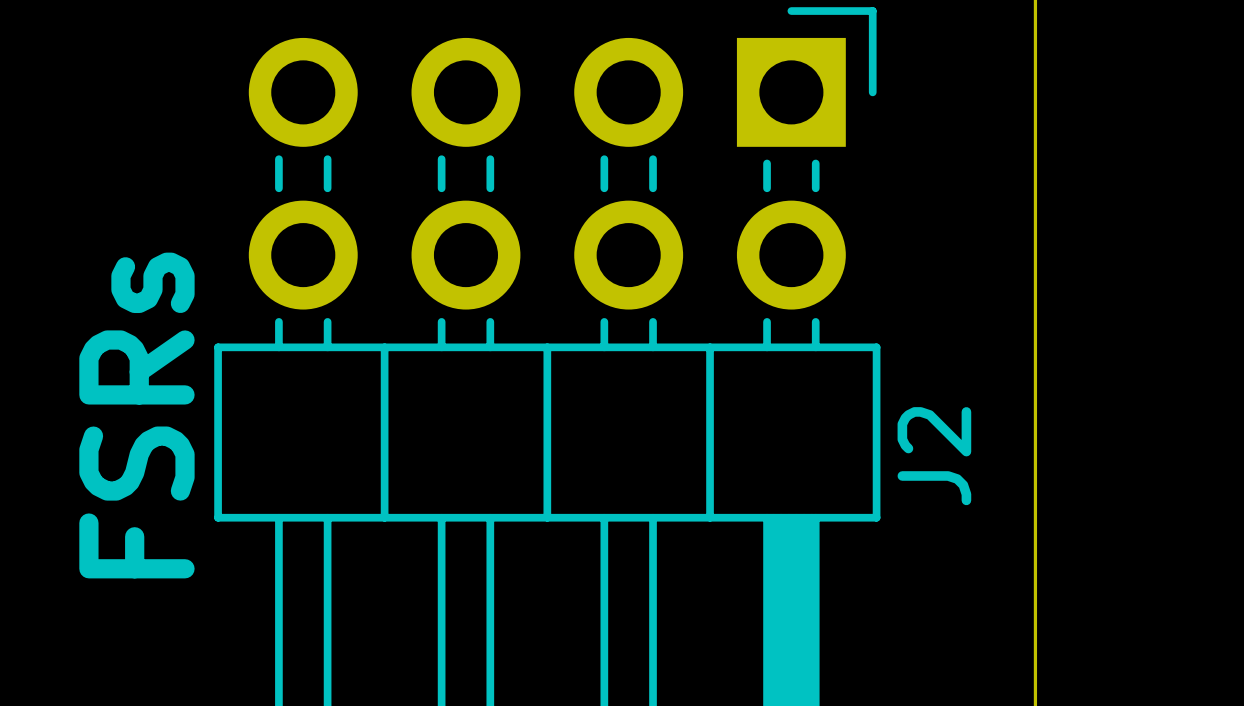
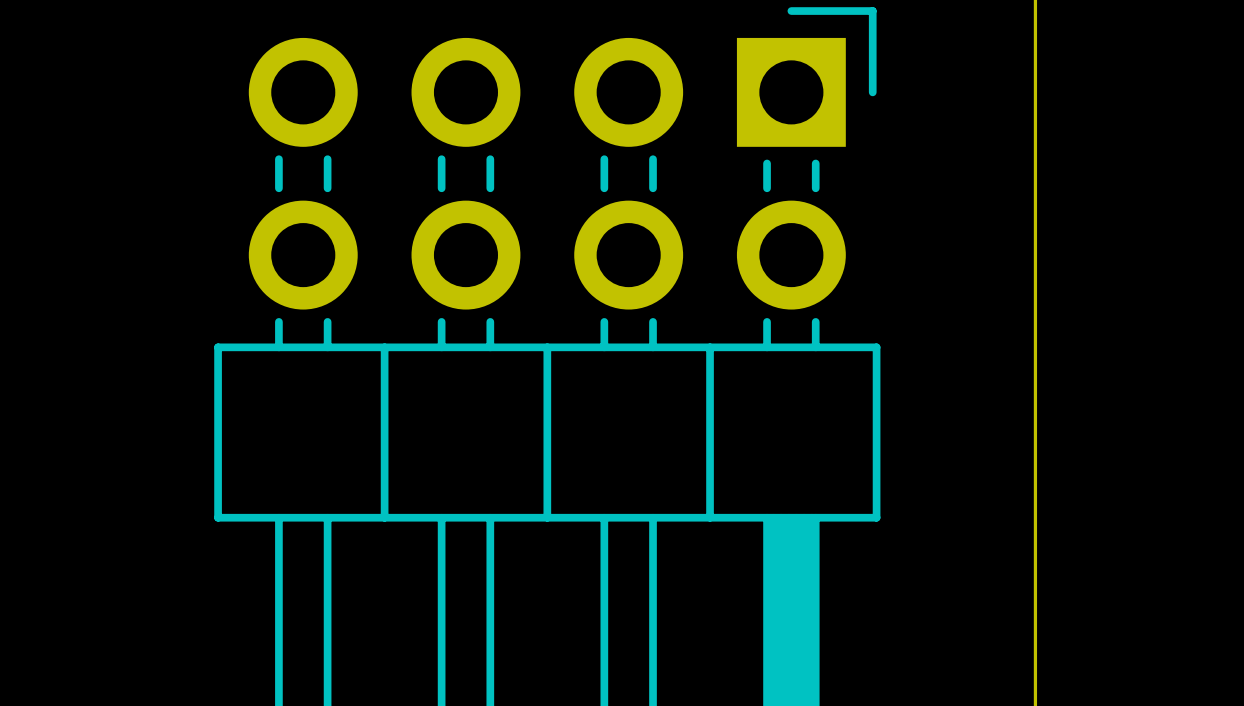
text: FSRs (136, 415) -> none
J2 name: J2 (934, 456) -> none

